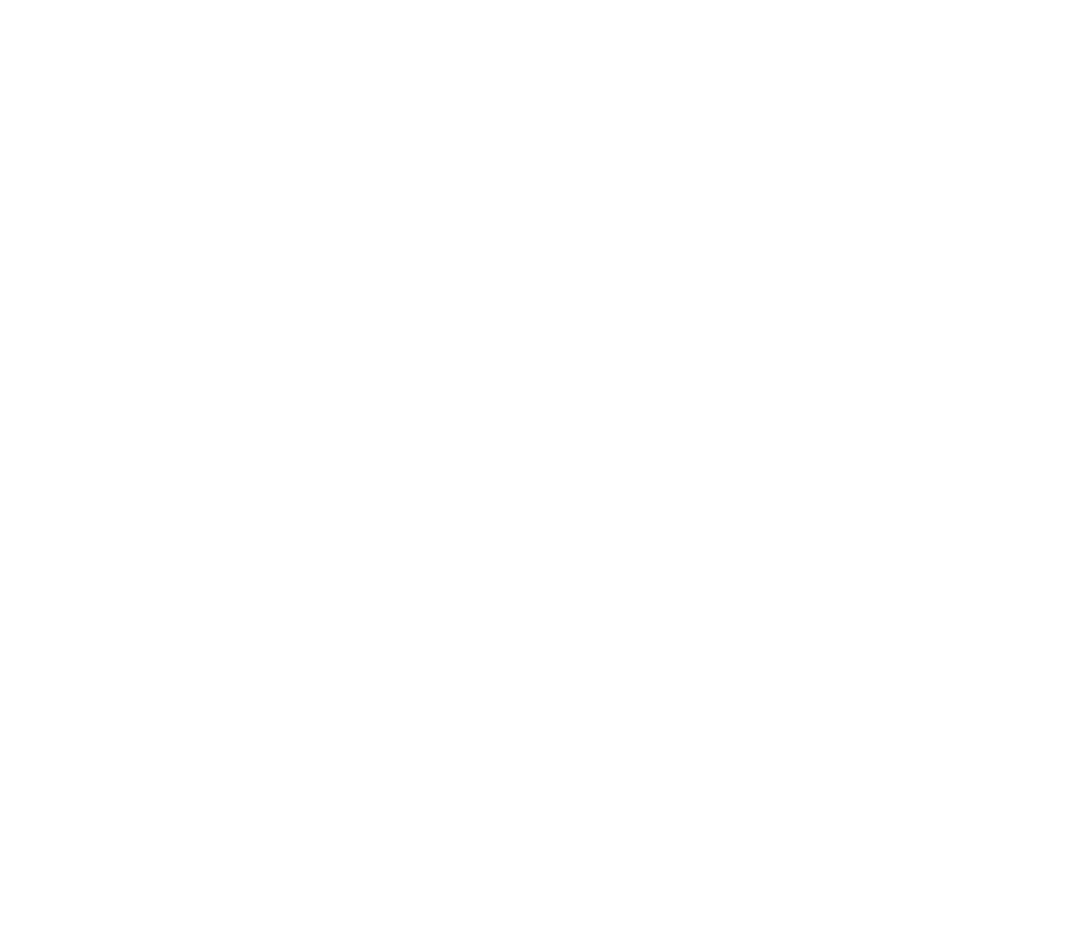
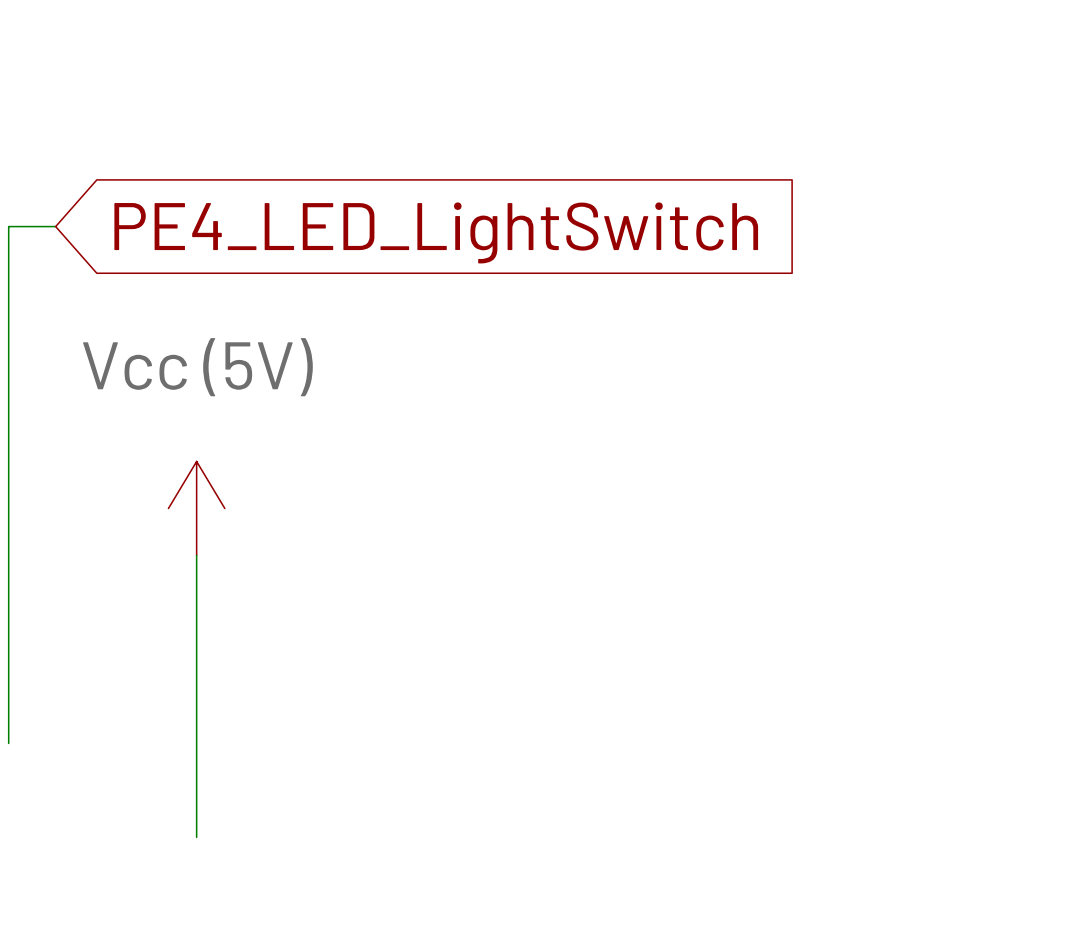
wire: none -> (55, 226) (8, 226) (8, 743)
global label: none -> PE4_LED_LightSwitch (436, 232)
power symbol: none -> Vcc (5V) (196, 508)
wire: none -> (196, 555) (196, 837)

